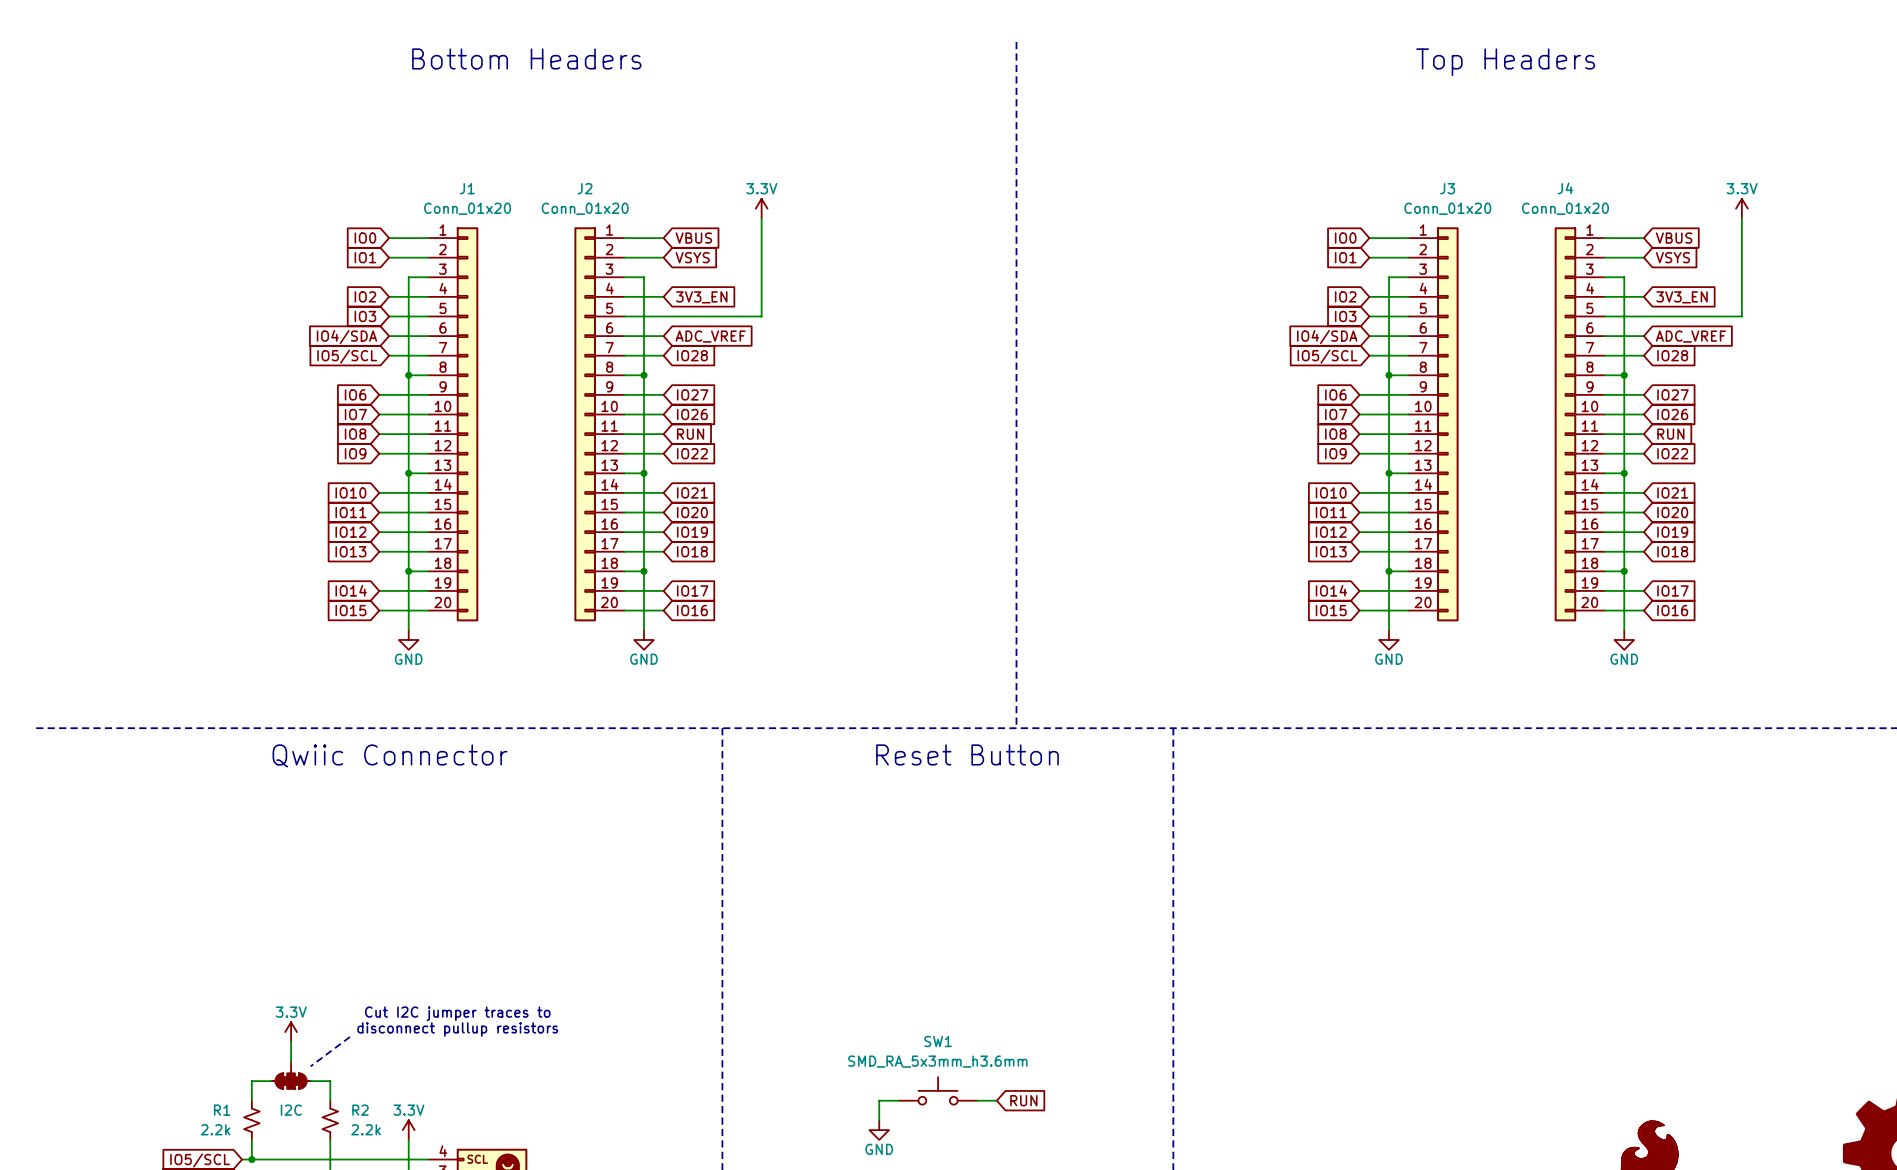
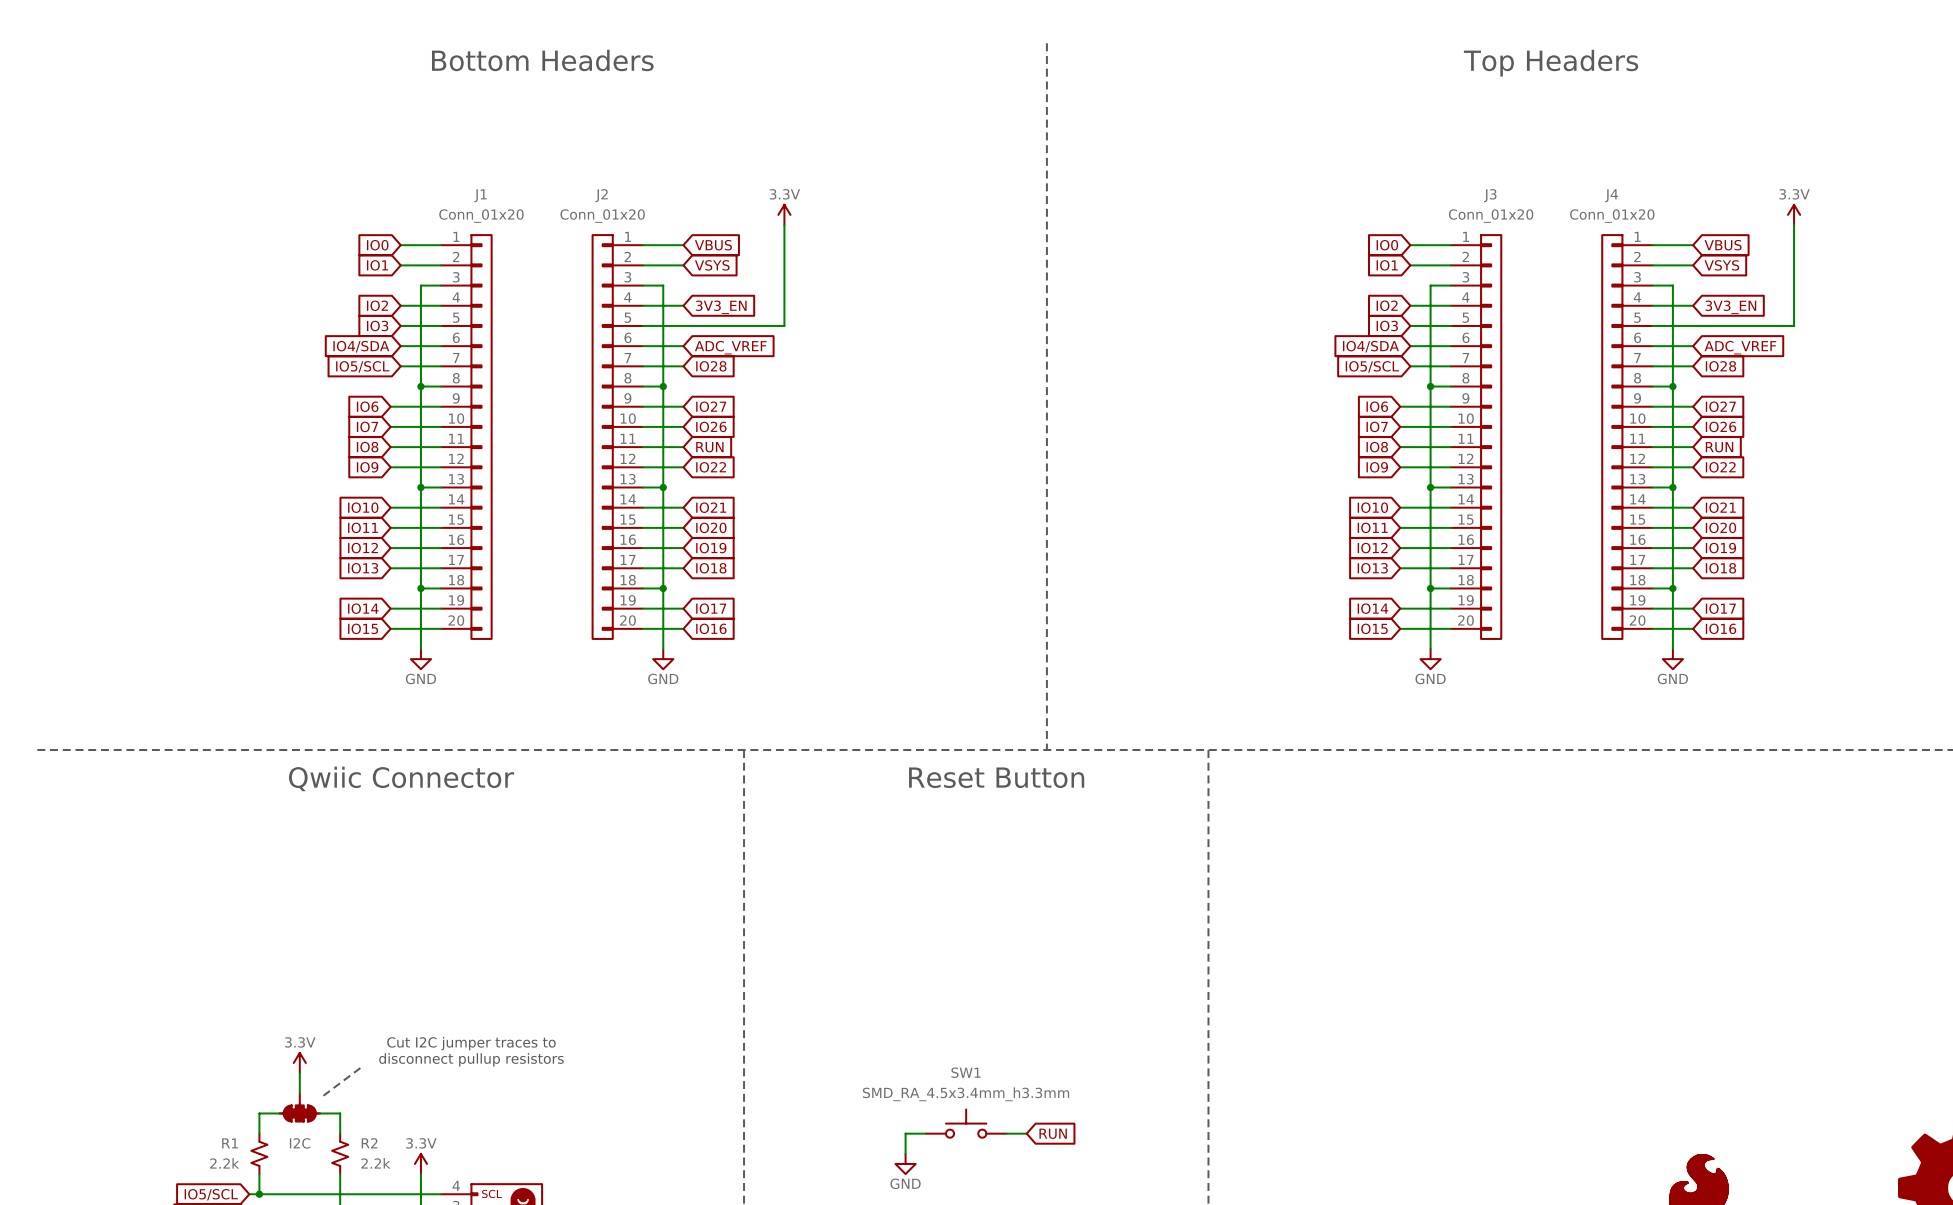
SW1 value: SMD_RA_5x3mm_h3.6mm (937, 1061) -> SMD_RA_4.5x3.4mm_h3.3mm (966, 1094)

